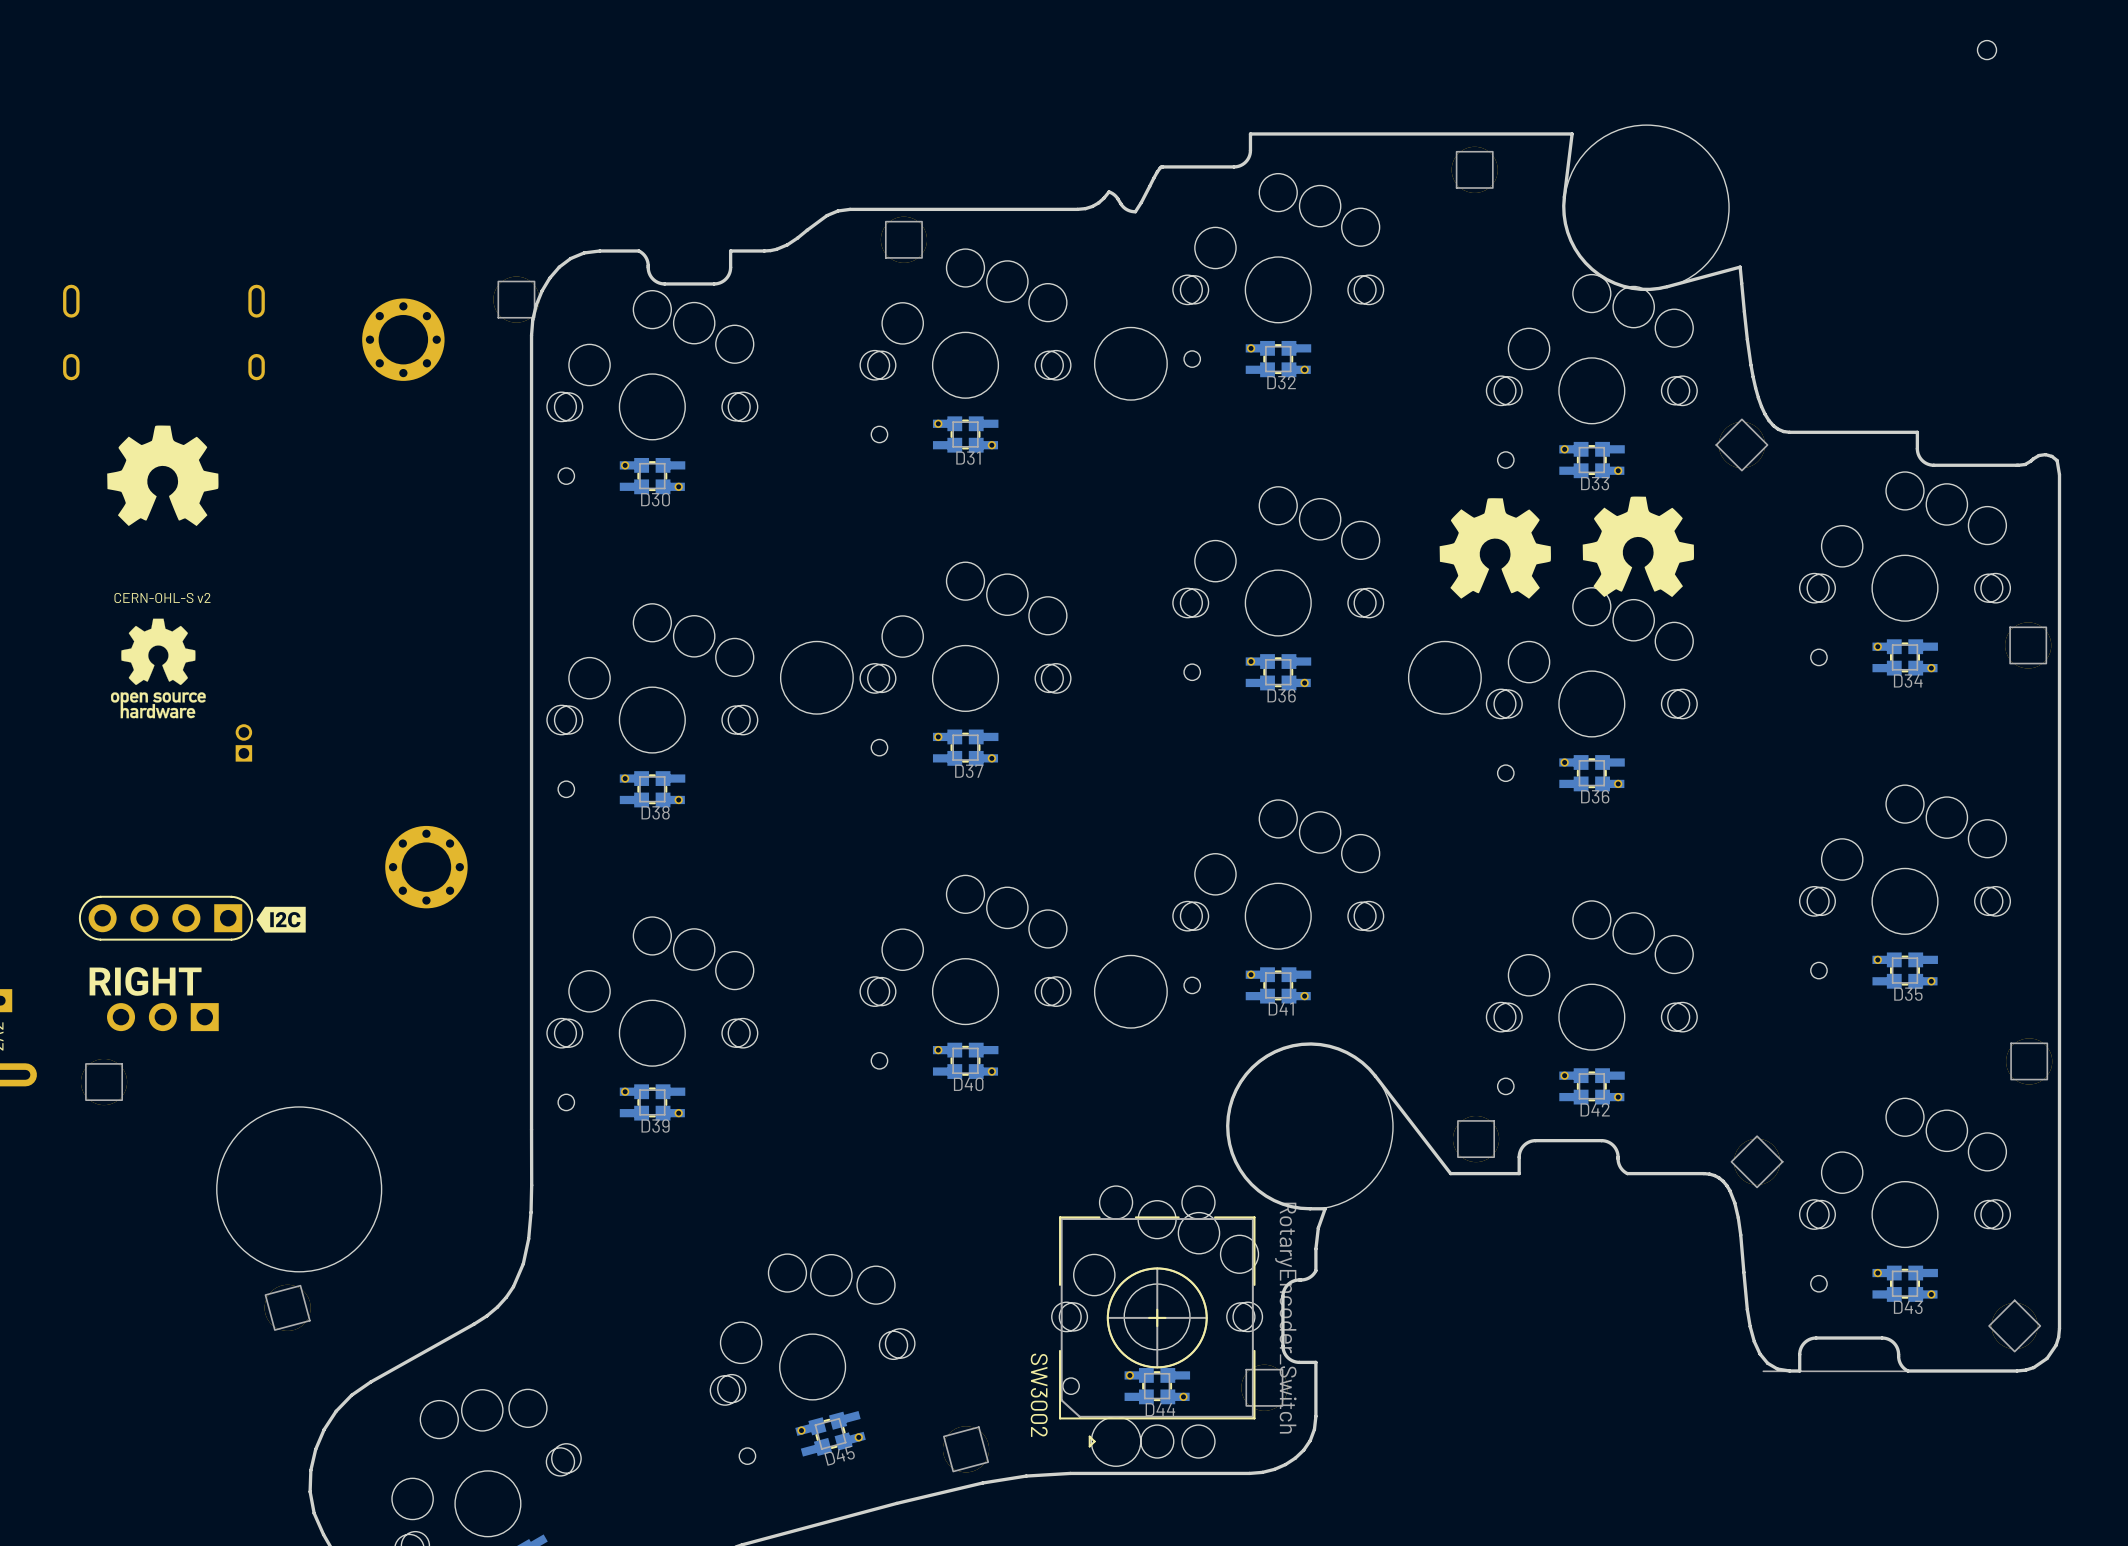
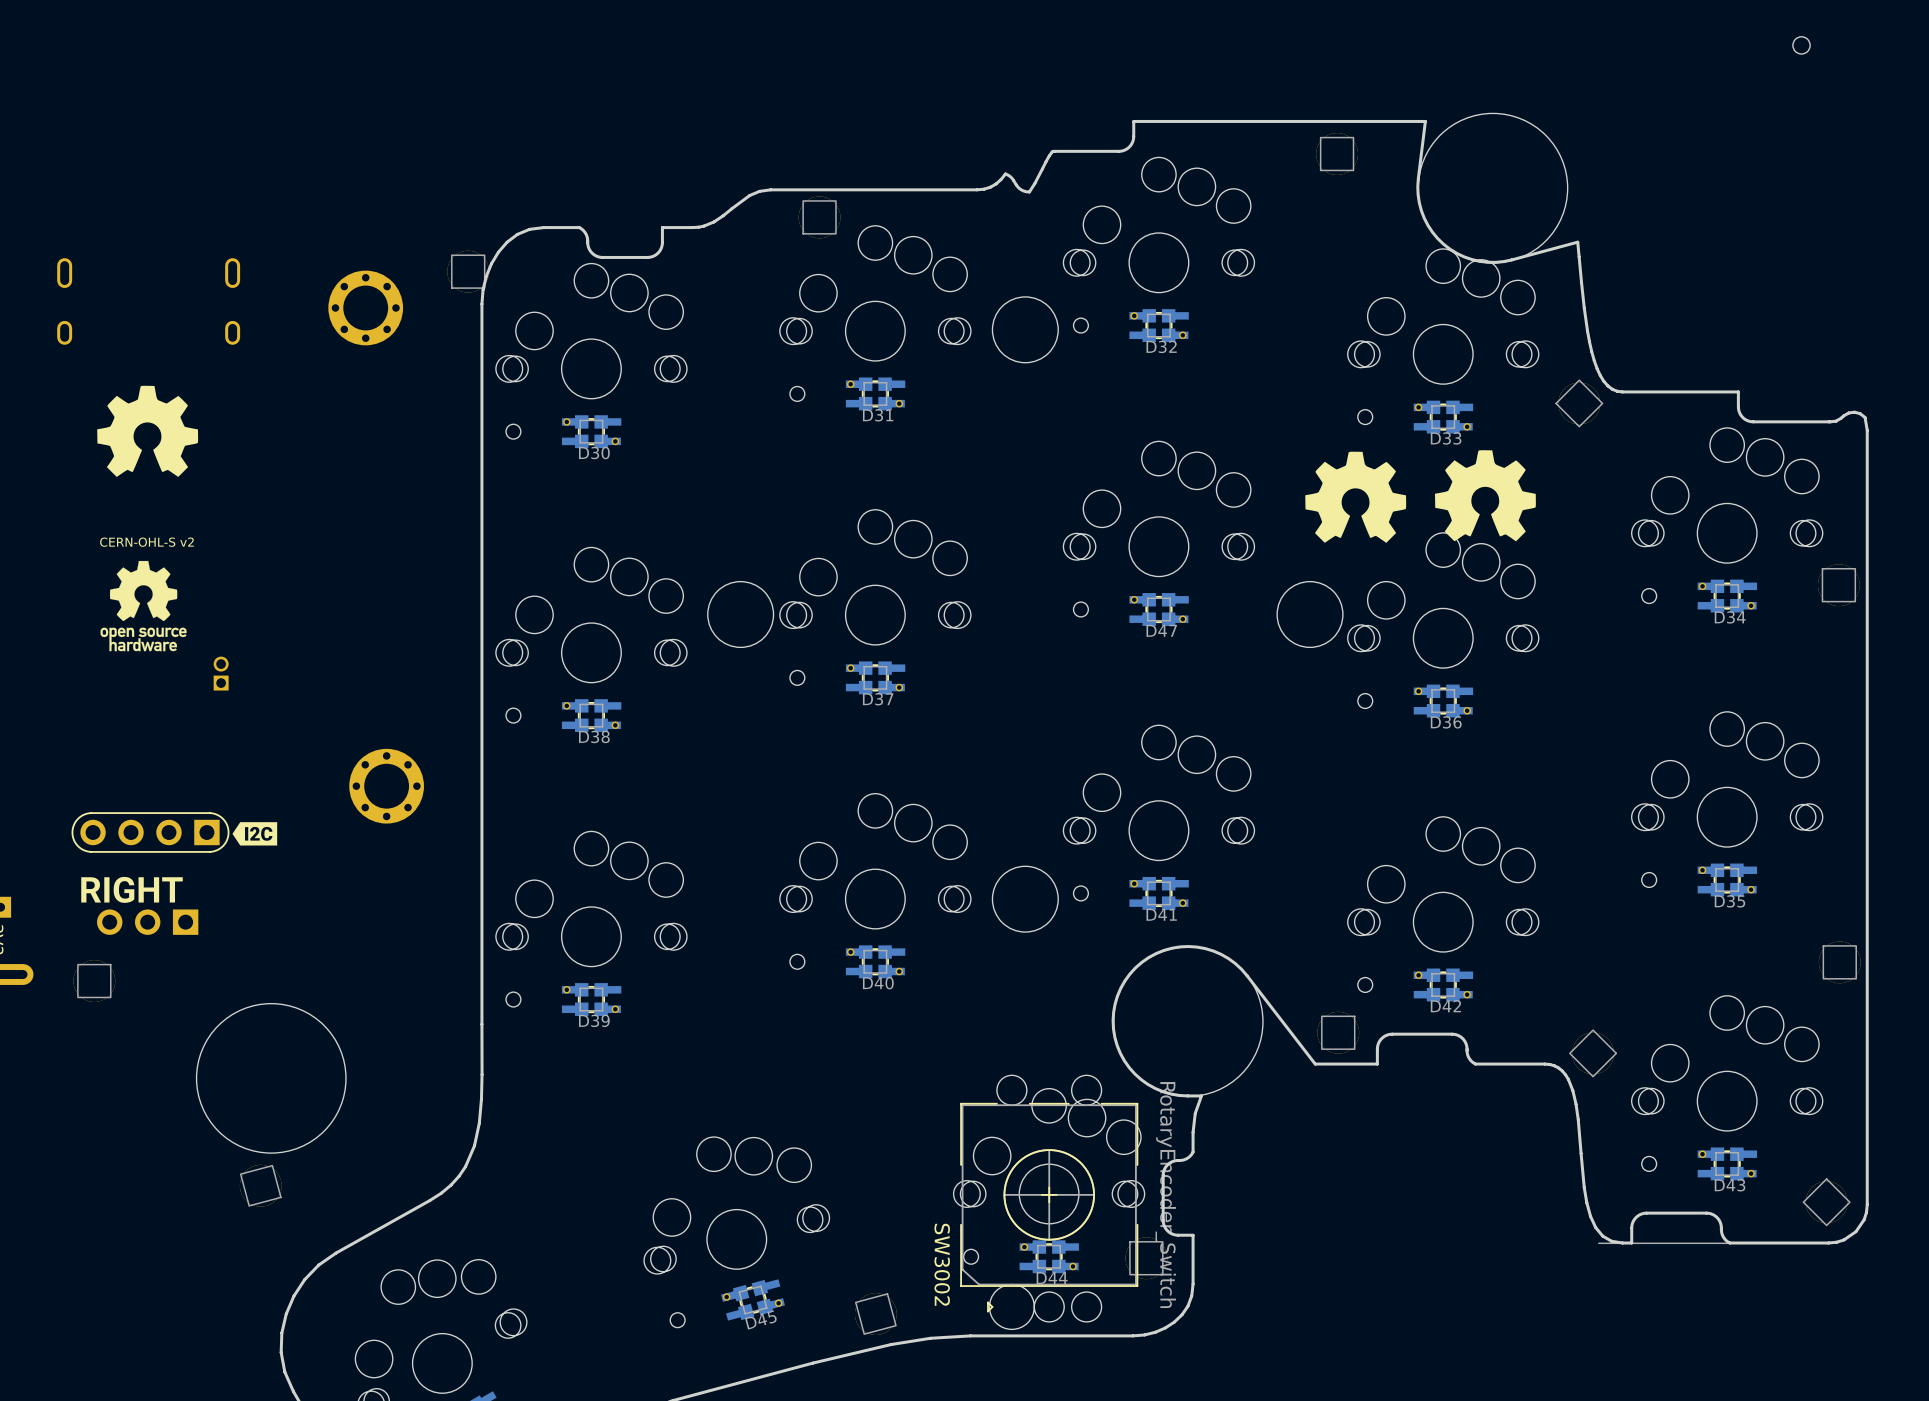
D36 name: D36 (1281, 695) -> D47 (1161, 630)

